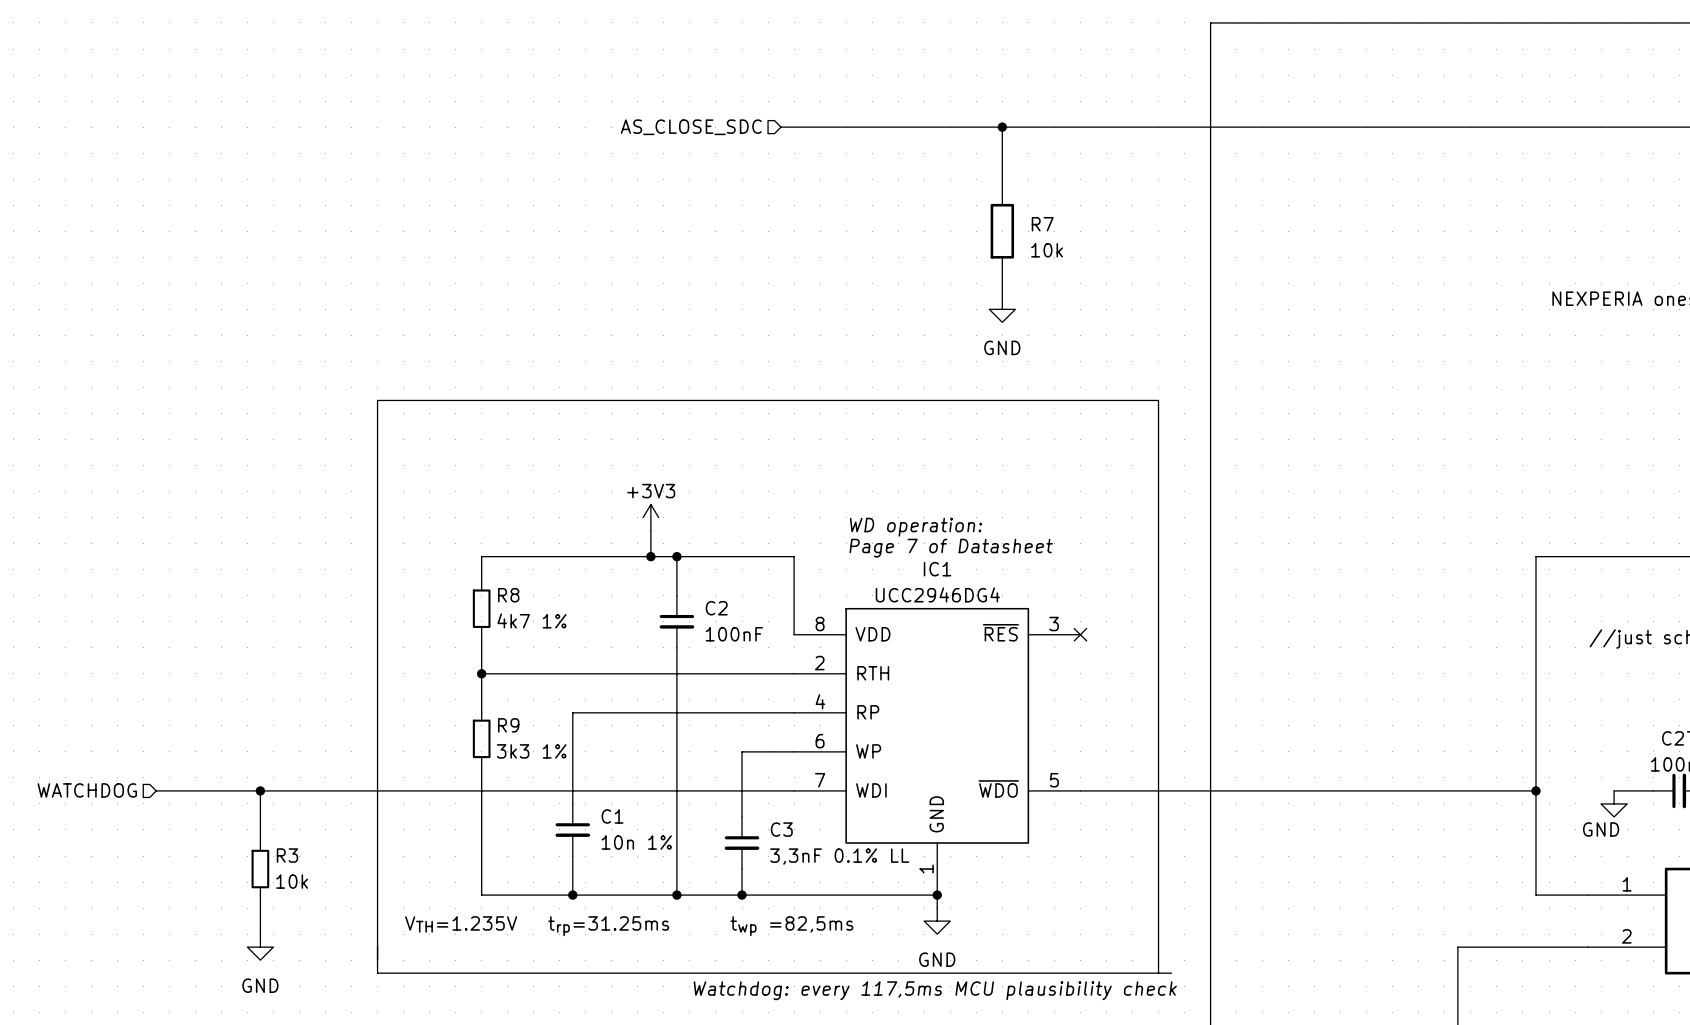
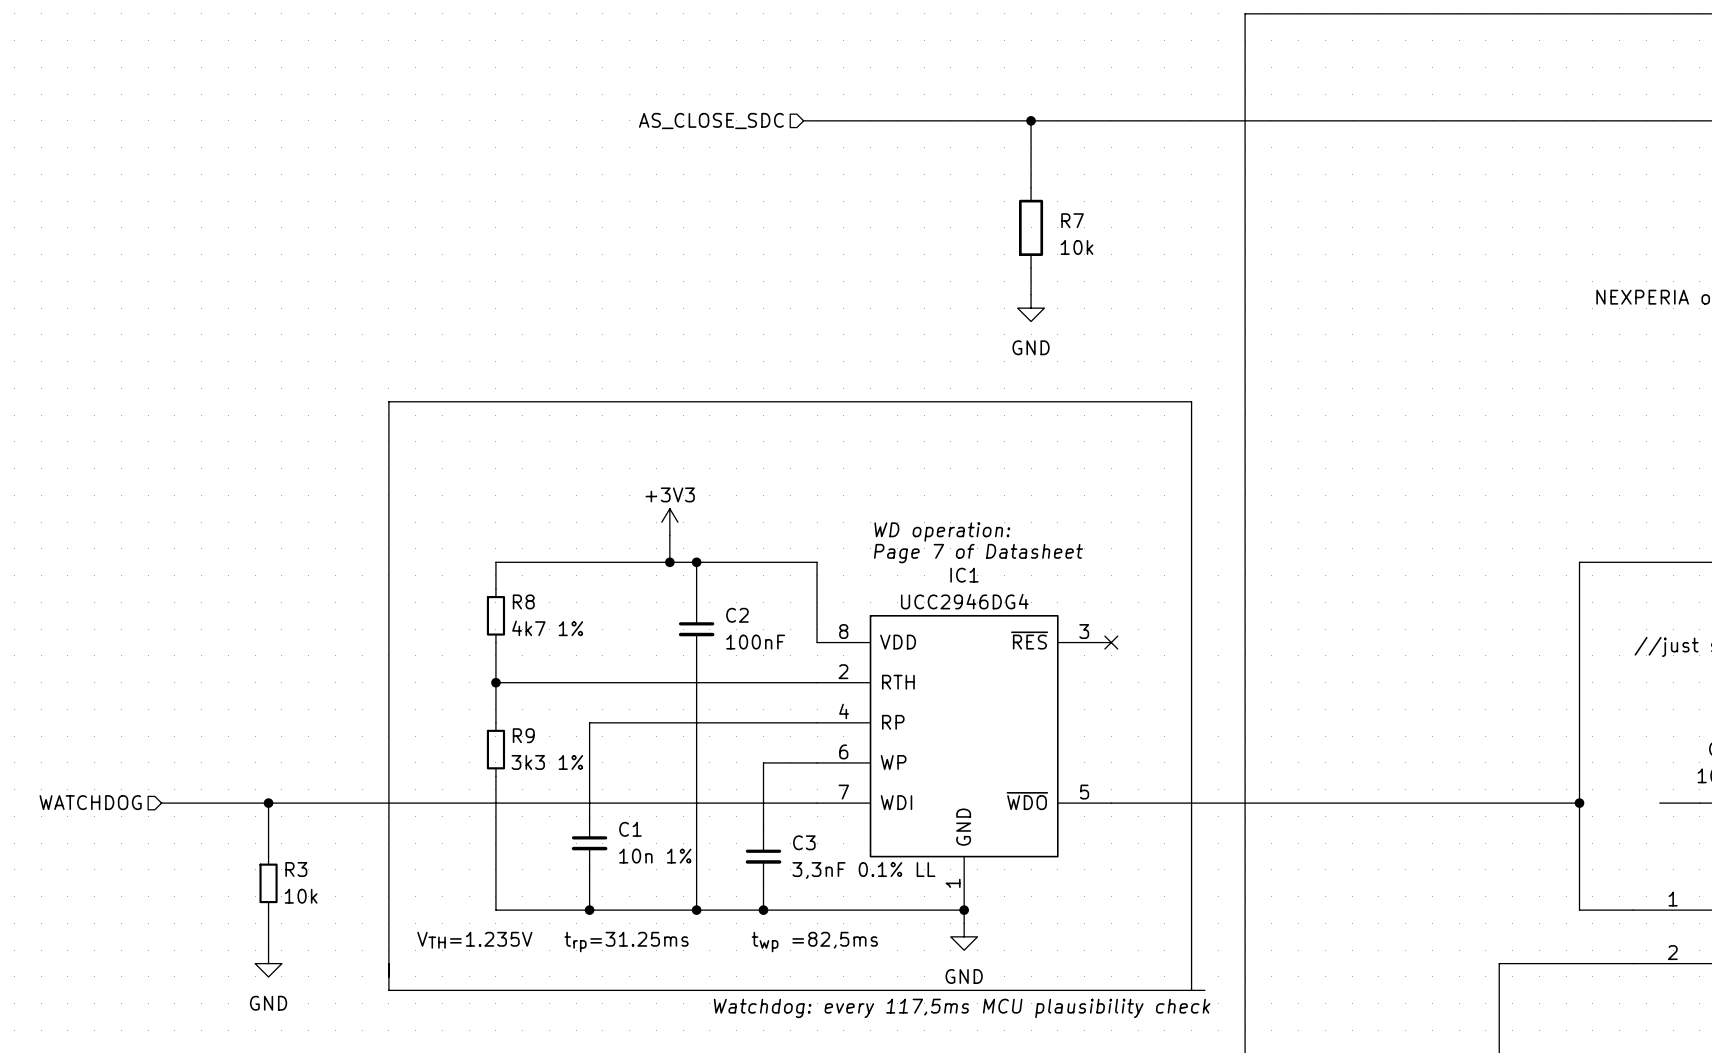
power symbol: GND (1614, 803) -> none

